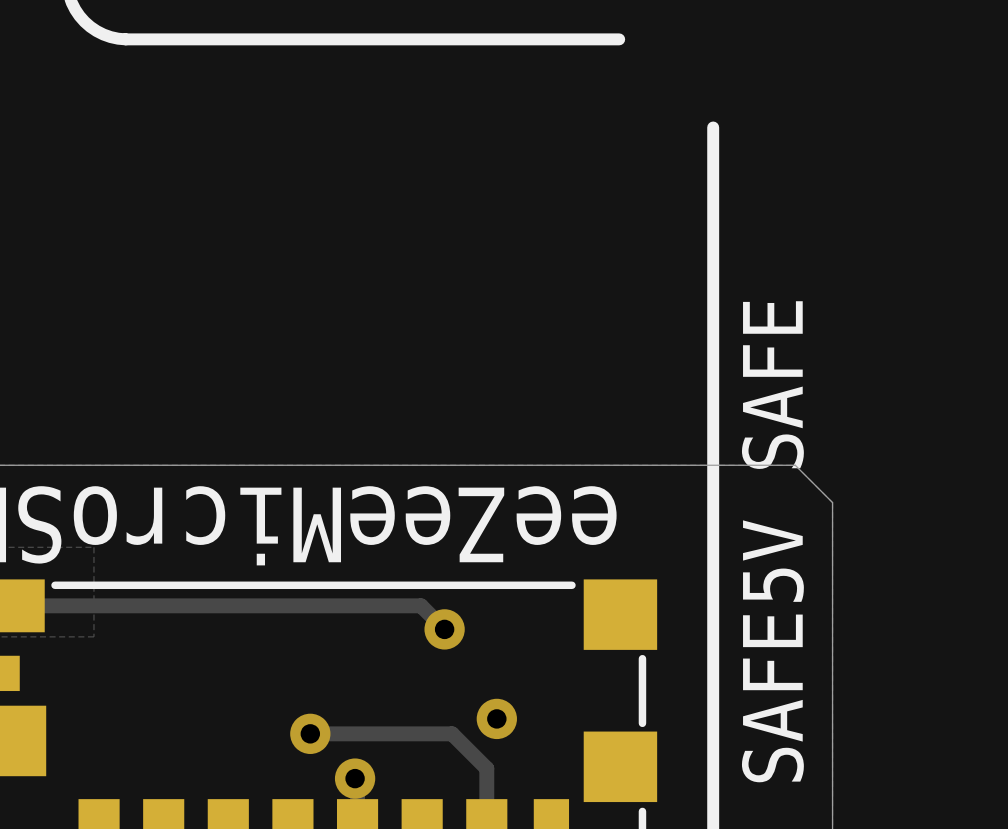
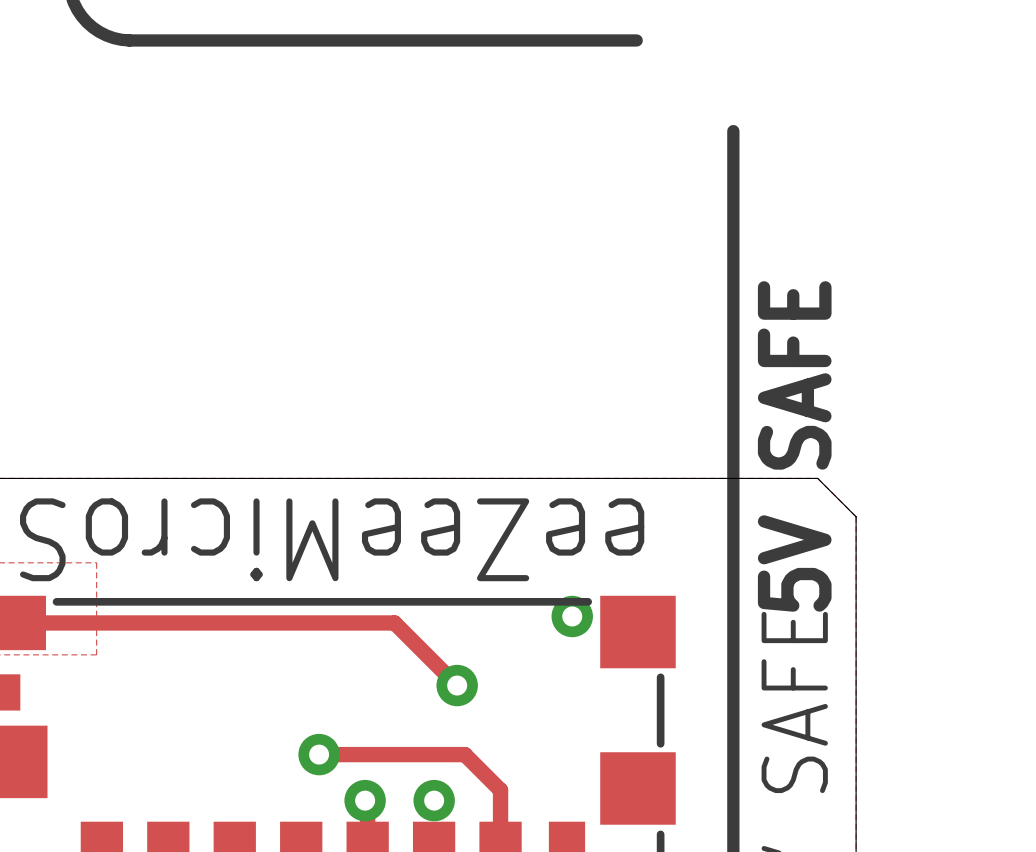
via: none -> (572, 616)
track: (383, 605) (421, 605) (444, 629) -> (394, 622) (457, 685)
via position: (444, 629) -> (457, 685)
via: (496, 718) -> none
via: none -> (434, 800)

